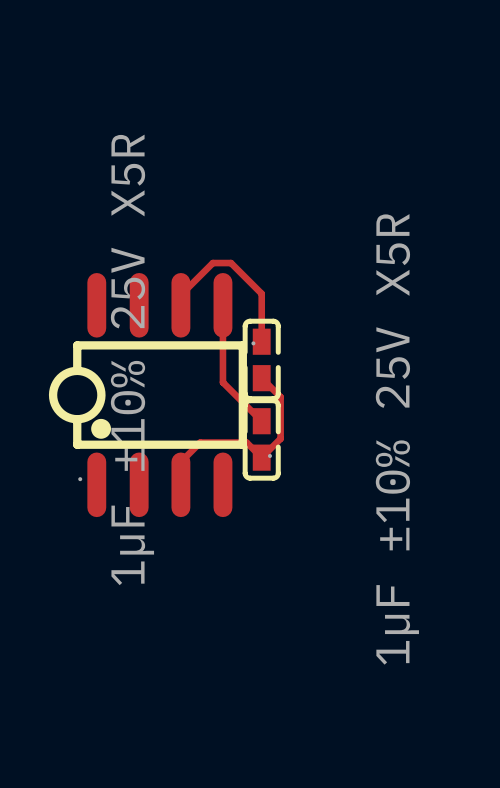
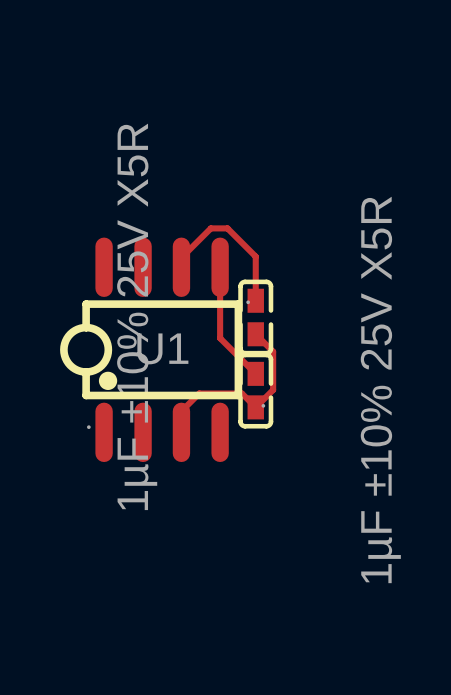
U1 name: none -> U1 (162, 348)

